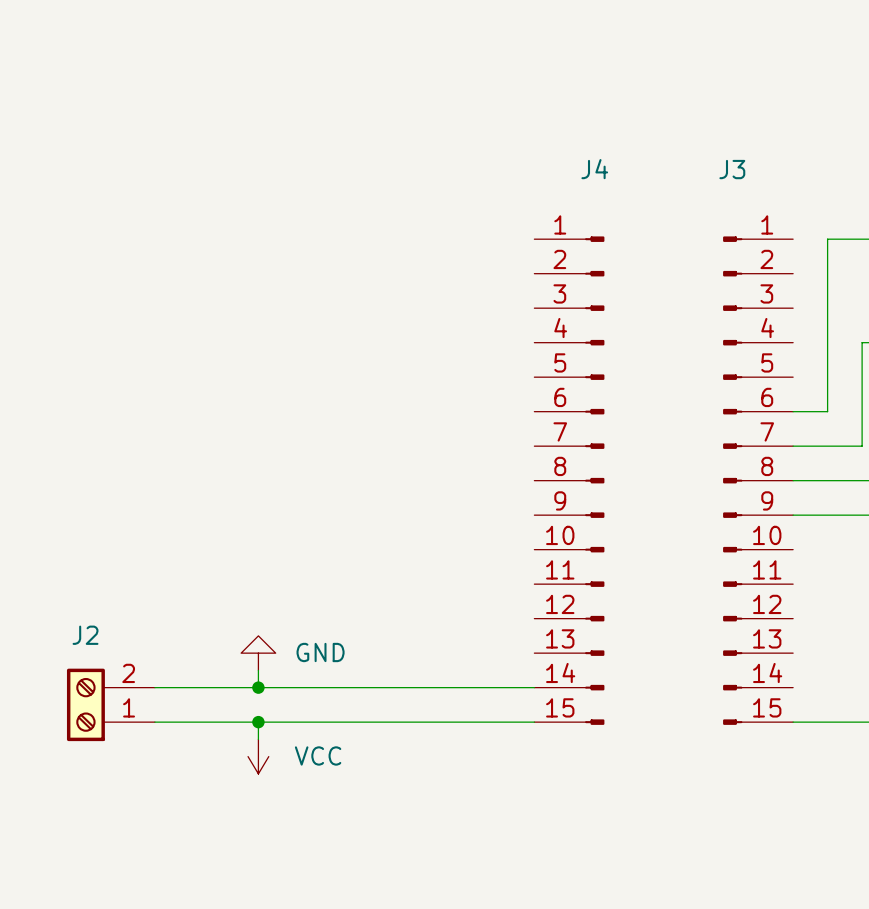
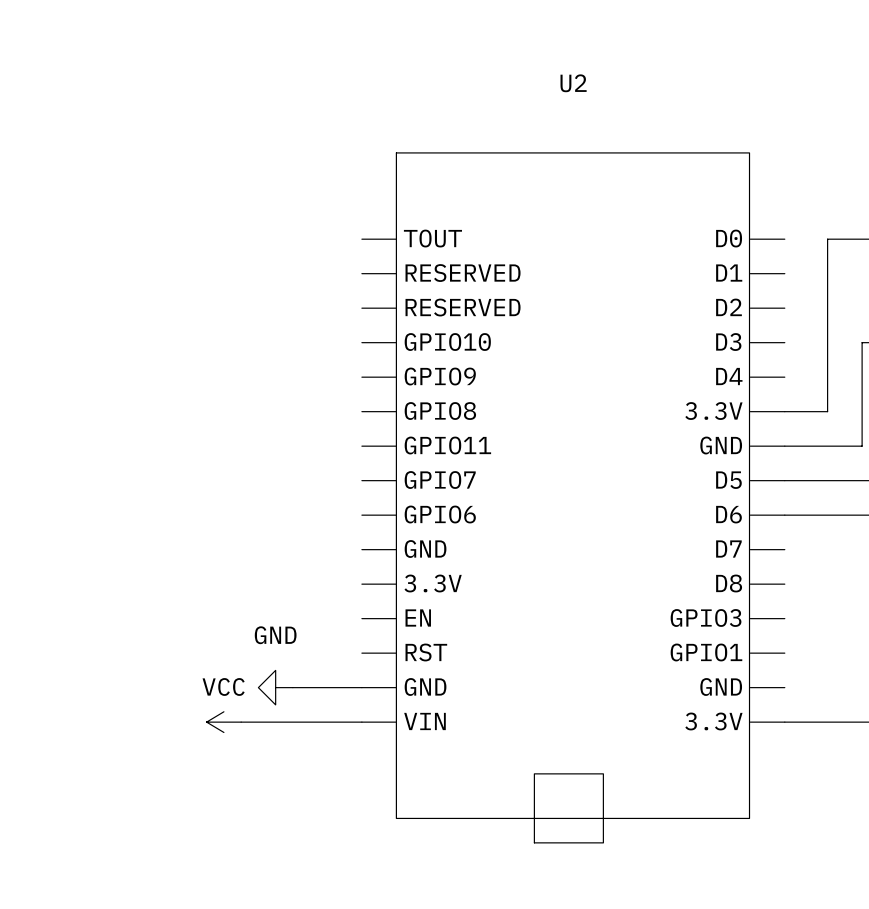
J4: (569, 480) -> none
J3: (758, 480) -> none
U2: none -> (573, 497)
power symbol rotation: 0° (258, 653) -> 90° counterclockwise (275, 687)
power symbol position: GND (258, 653) -> GND (275, 687)
wire: (258, 670) (258, 687) -> none
wire: (154, 687) (292, 687) -> none
junction: (258, 687) -> none
wire: (361, 687) (534, 687) -> none
J2: (110, 704) -> none
wire: (154, 722) (241, 722) -> none
wire: (258, 722) (258, 739) -> none
junction: (258, 722) -> none
wire: (361, 722) (534, 722) -> none
power symbol text position: VCC (318, 755) -> VCC (223, 686)
power symbol rotation: 0° (258, 756) -> 90° clockwise (223, 722)
power symbol position: VCC (258, 756) -> VCC (223, 722)

